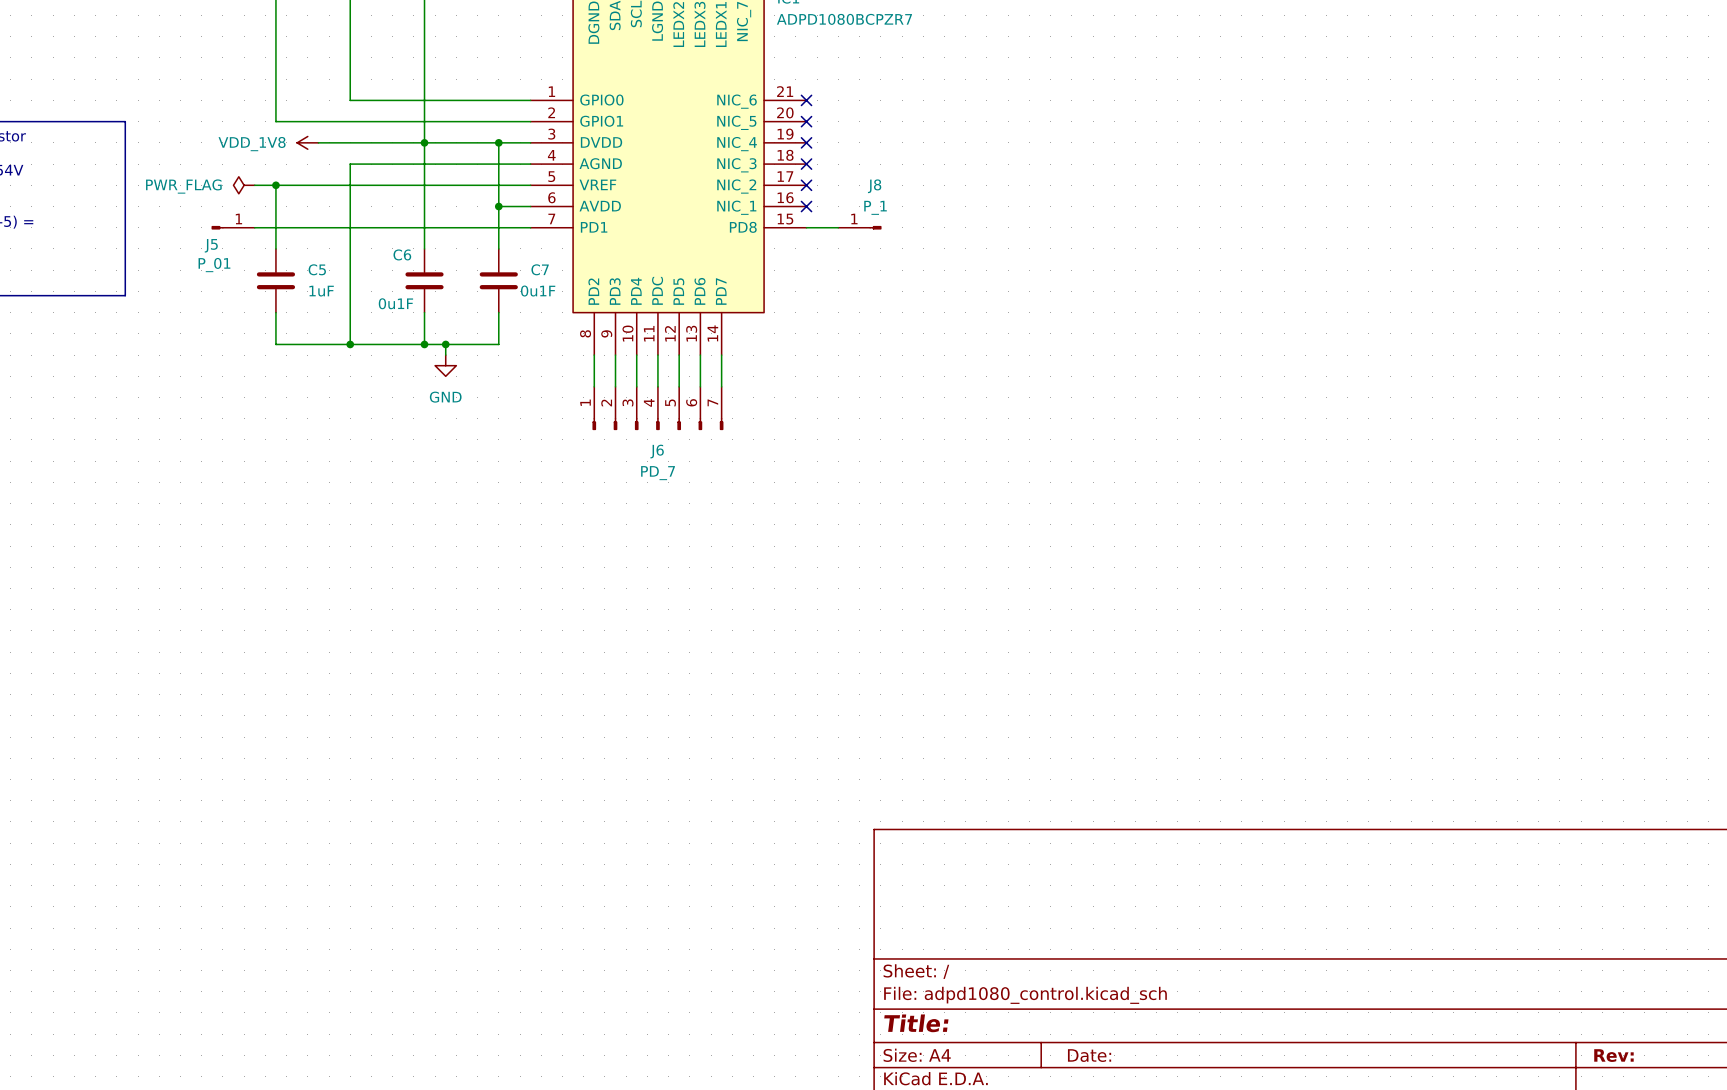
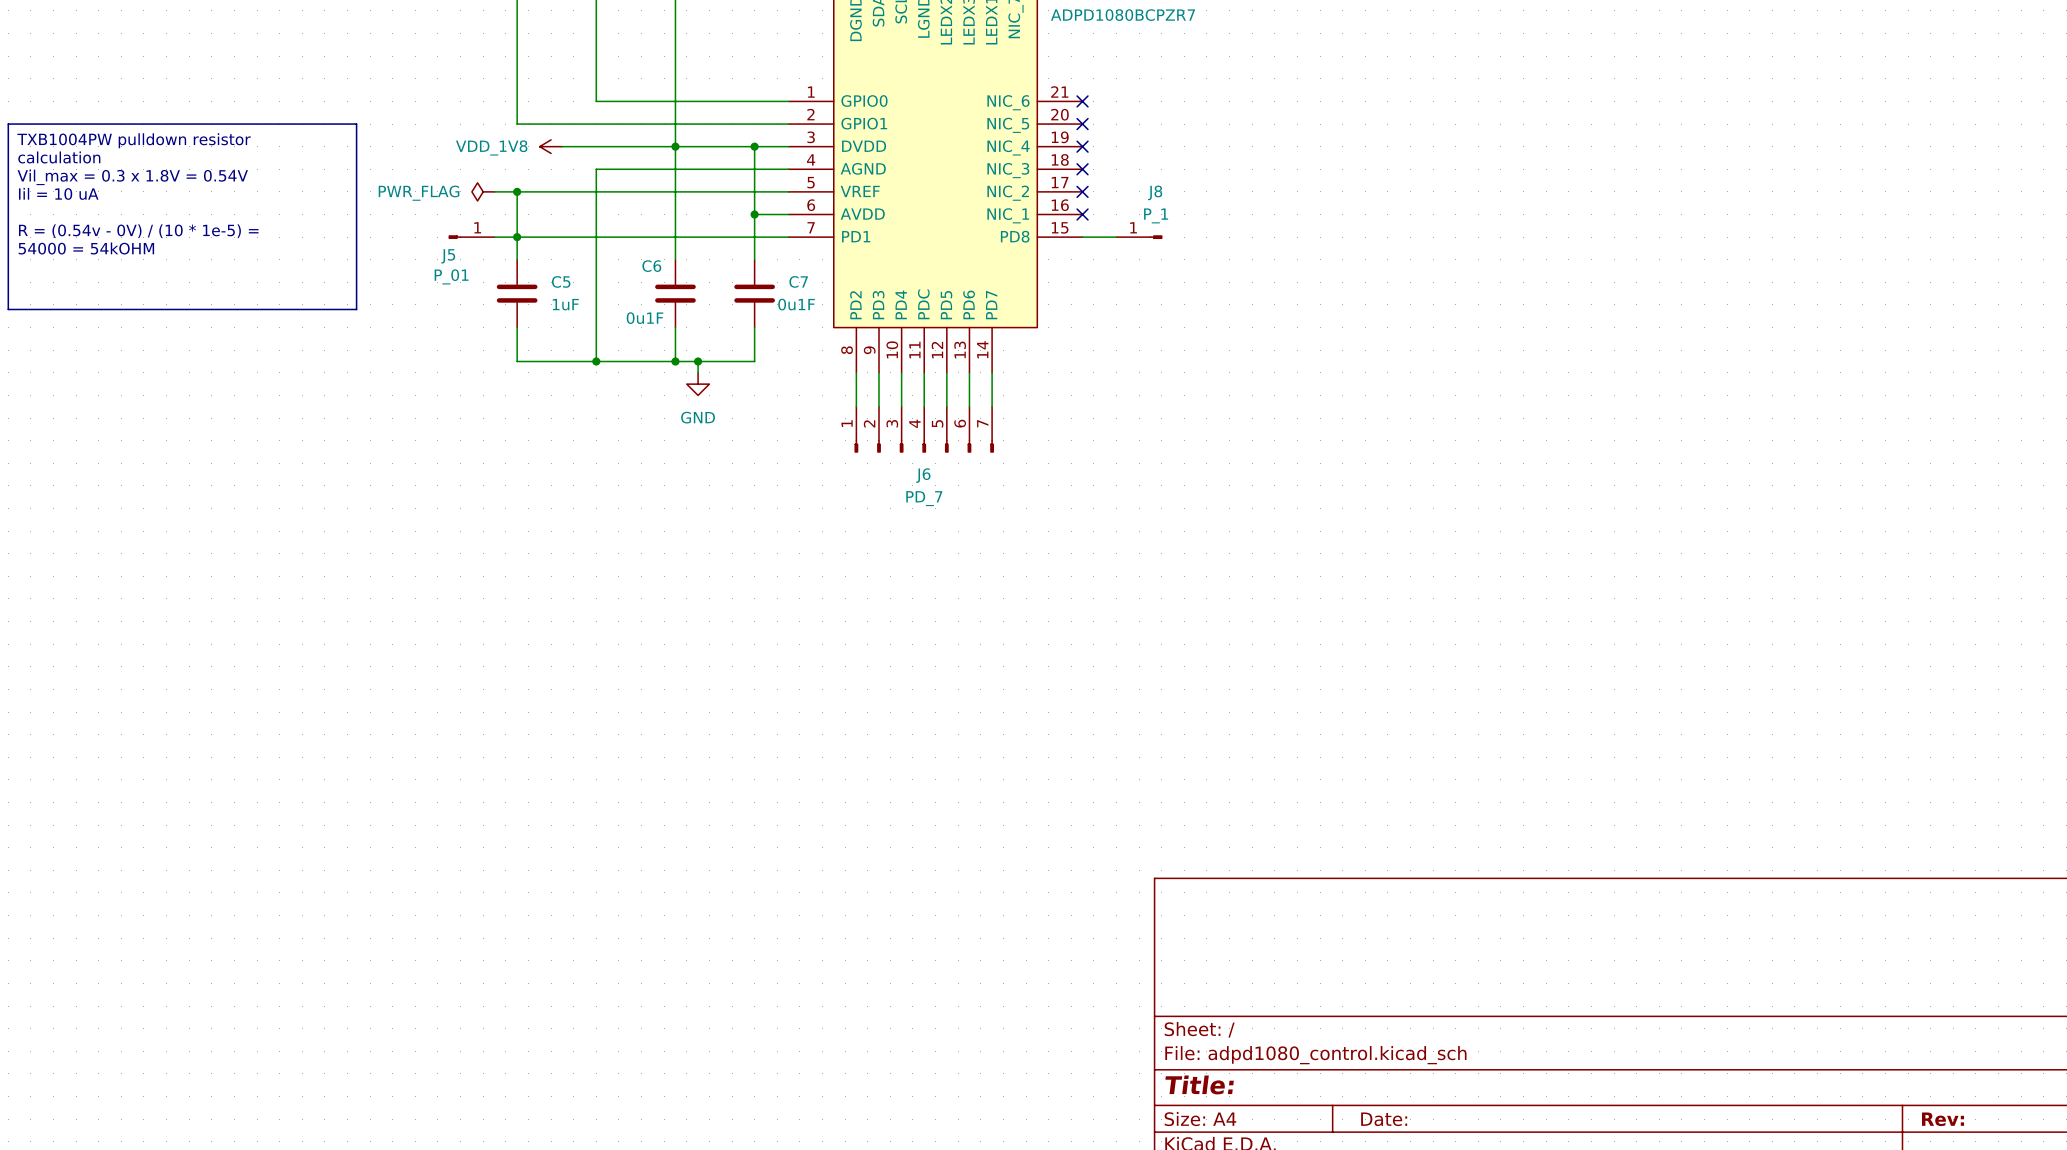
junction: none -> (517, 237)

